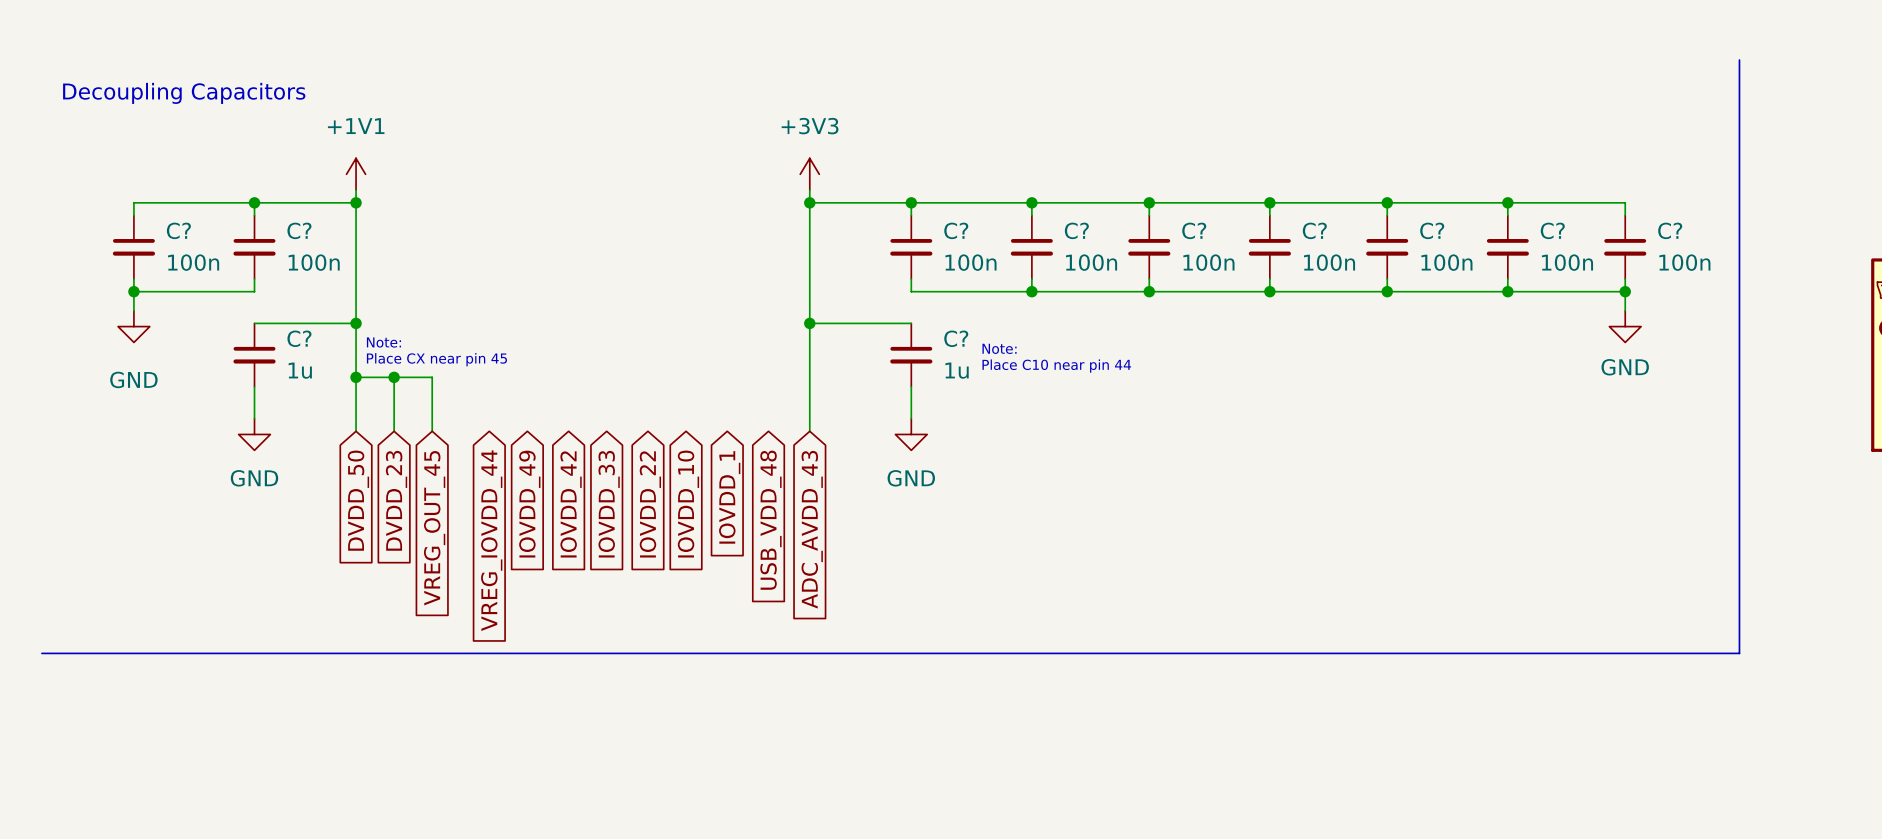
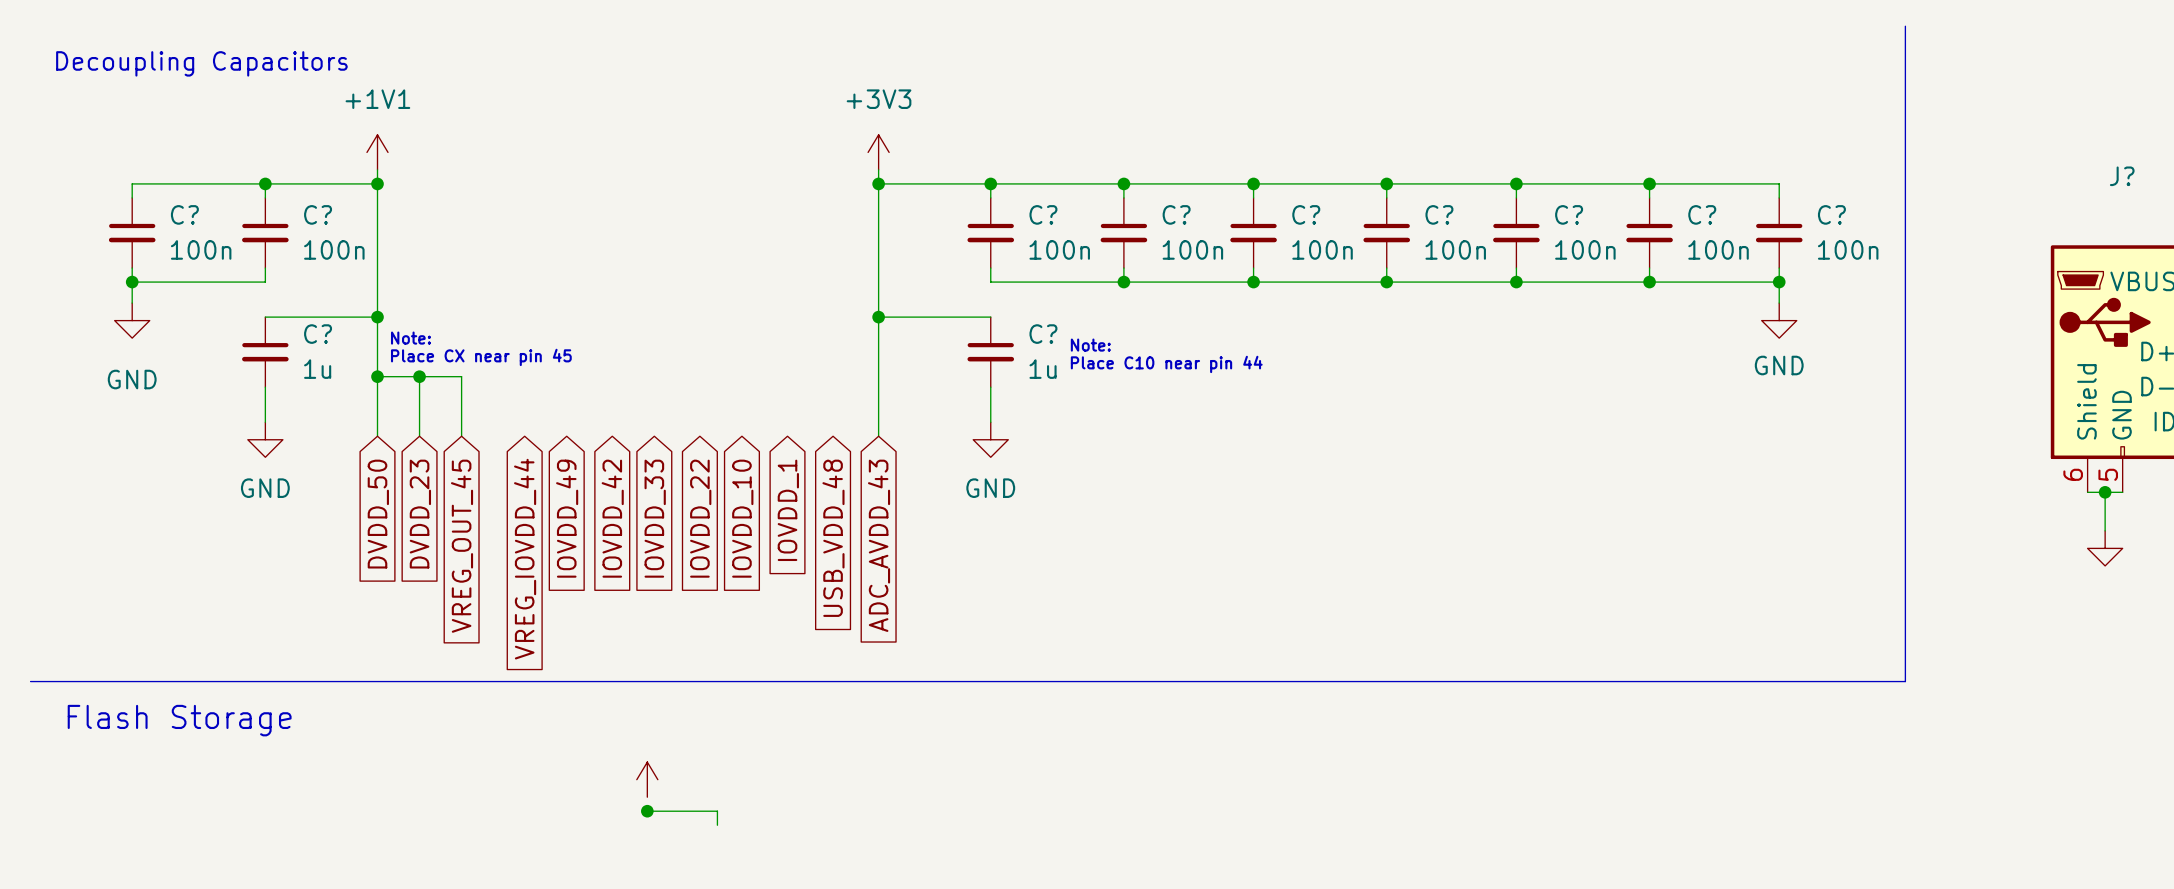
text: none -> Flash Storage (179, 720)
power symbol: none -> (647, 779)
wire: none -> (647, 811) (717, 811) (717, 825)
junction: none -> (647, 811)

